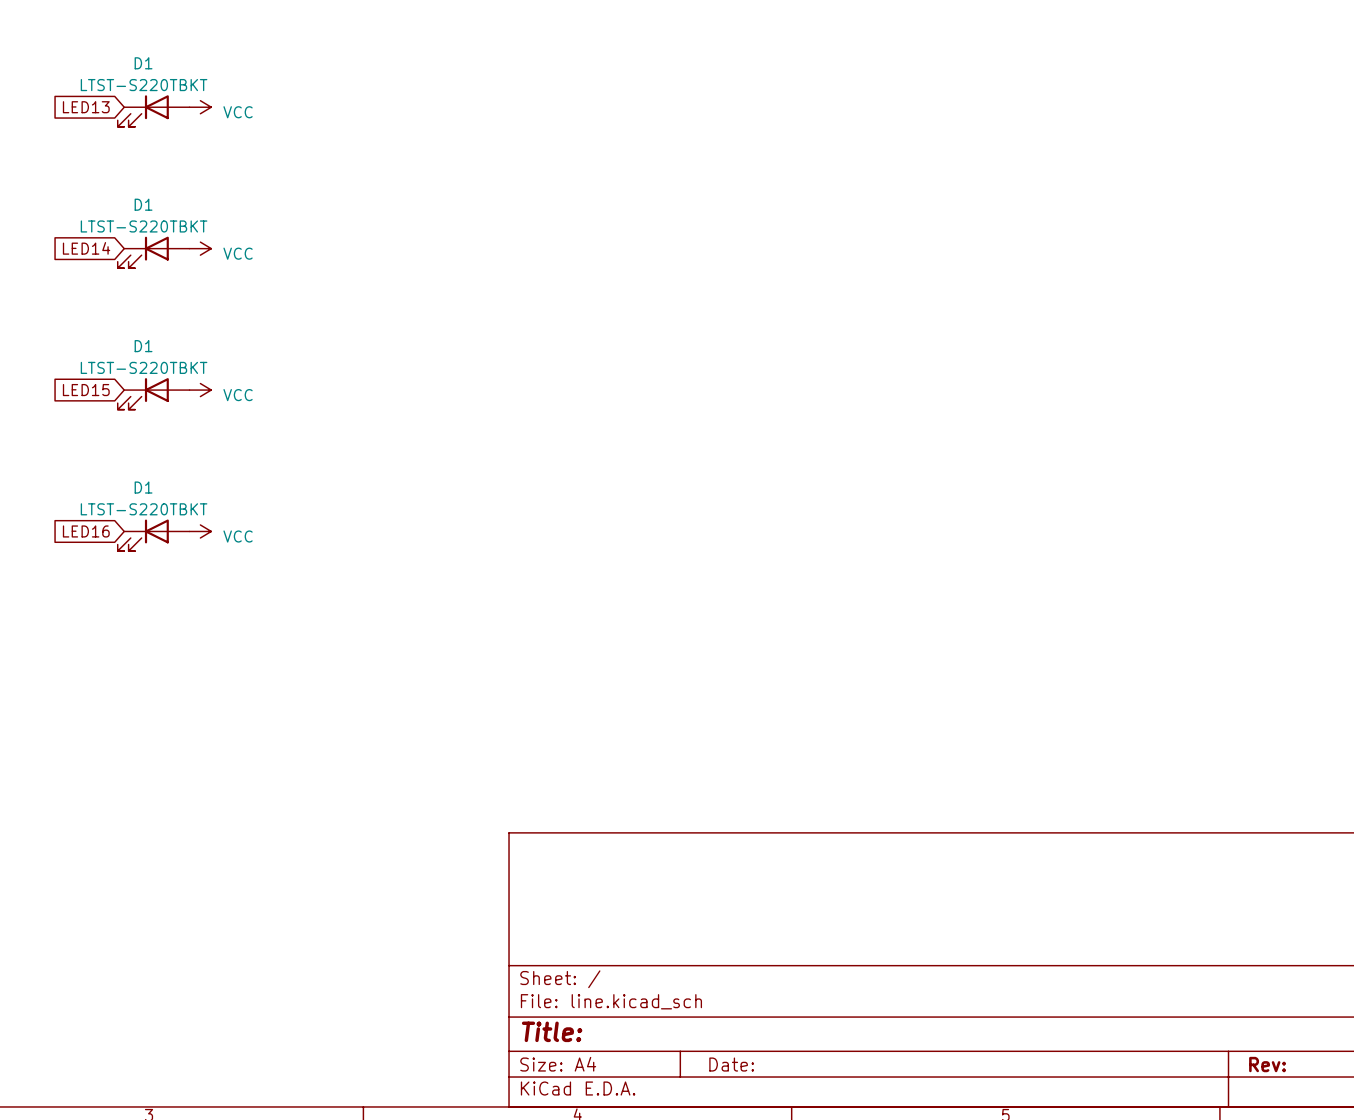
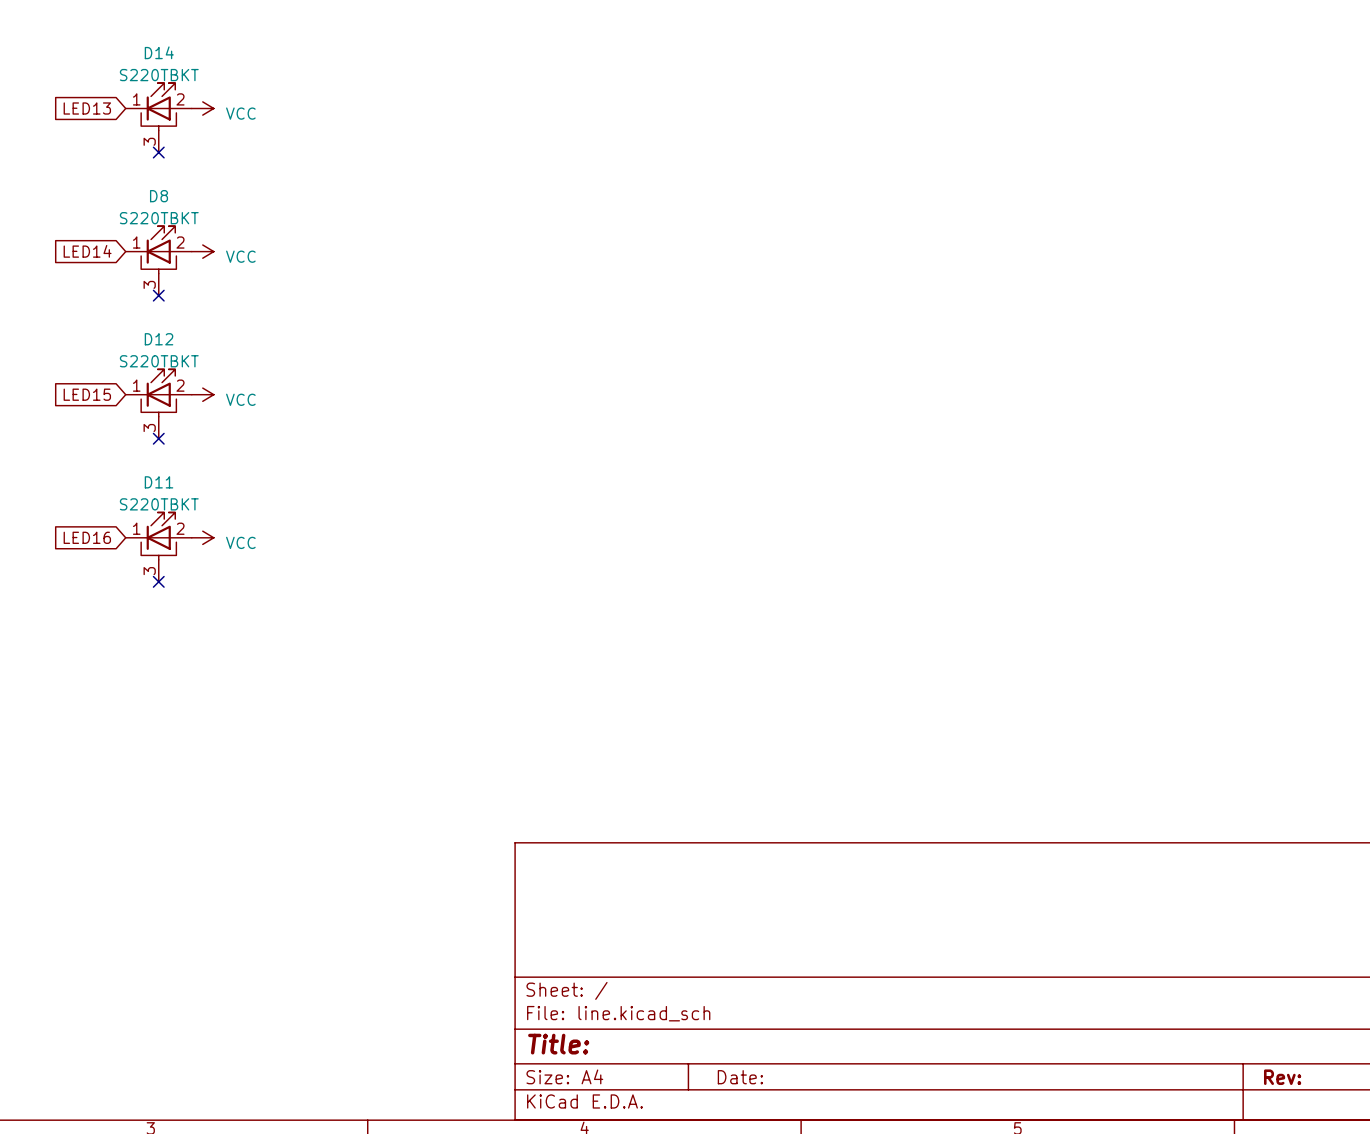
D1: LTST-S220TBKT (153, 111) -> none
D14: none -> S220TBKT (158, 117)
no-connect mark: none -> (158, 152)
D1: LTST-S220TBKT (153, 252) -> none
D8: none -> S220TBKT (158, 260)
no-connect mark: none -> (158, 295)
D1: LTST-S220TBKT (153, 393) -> none
D12: none -> S220TBKT (158, 404)
no-connect mark: none -> (158, 438)
D1: LTST-S220TBKT (153, 535) -> none
D11: none -> S220TBKT (158, 547)
no-connect mark: none -> (158, 581)

